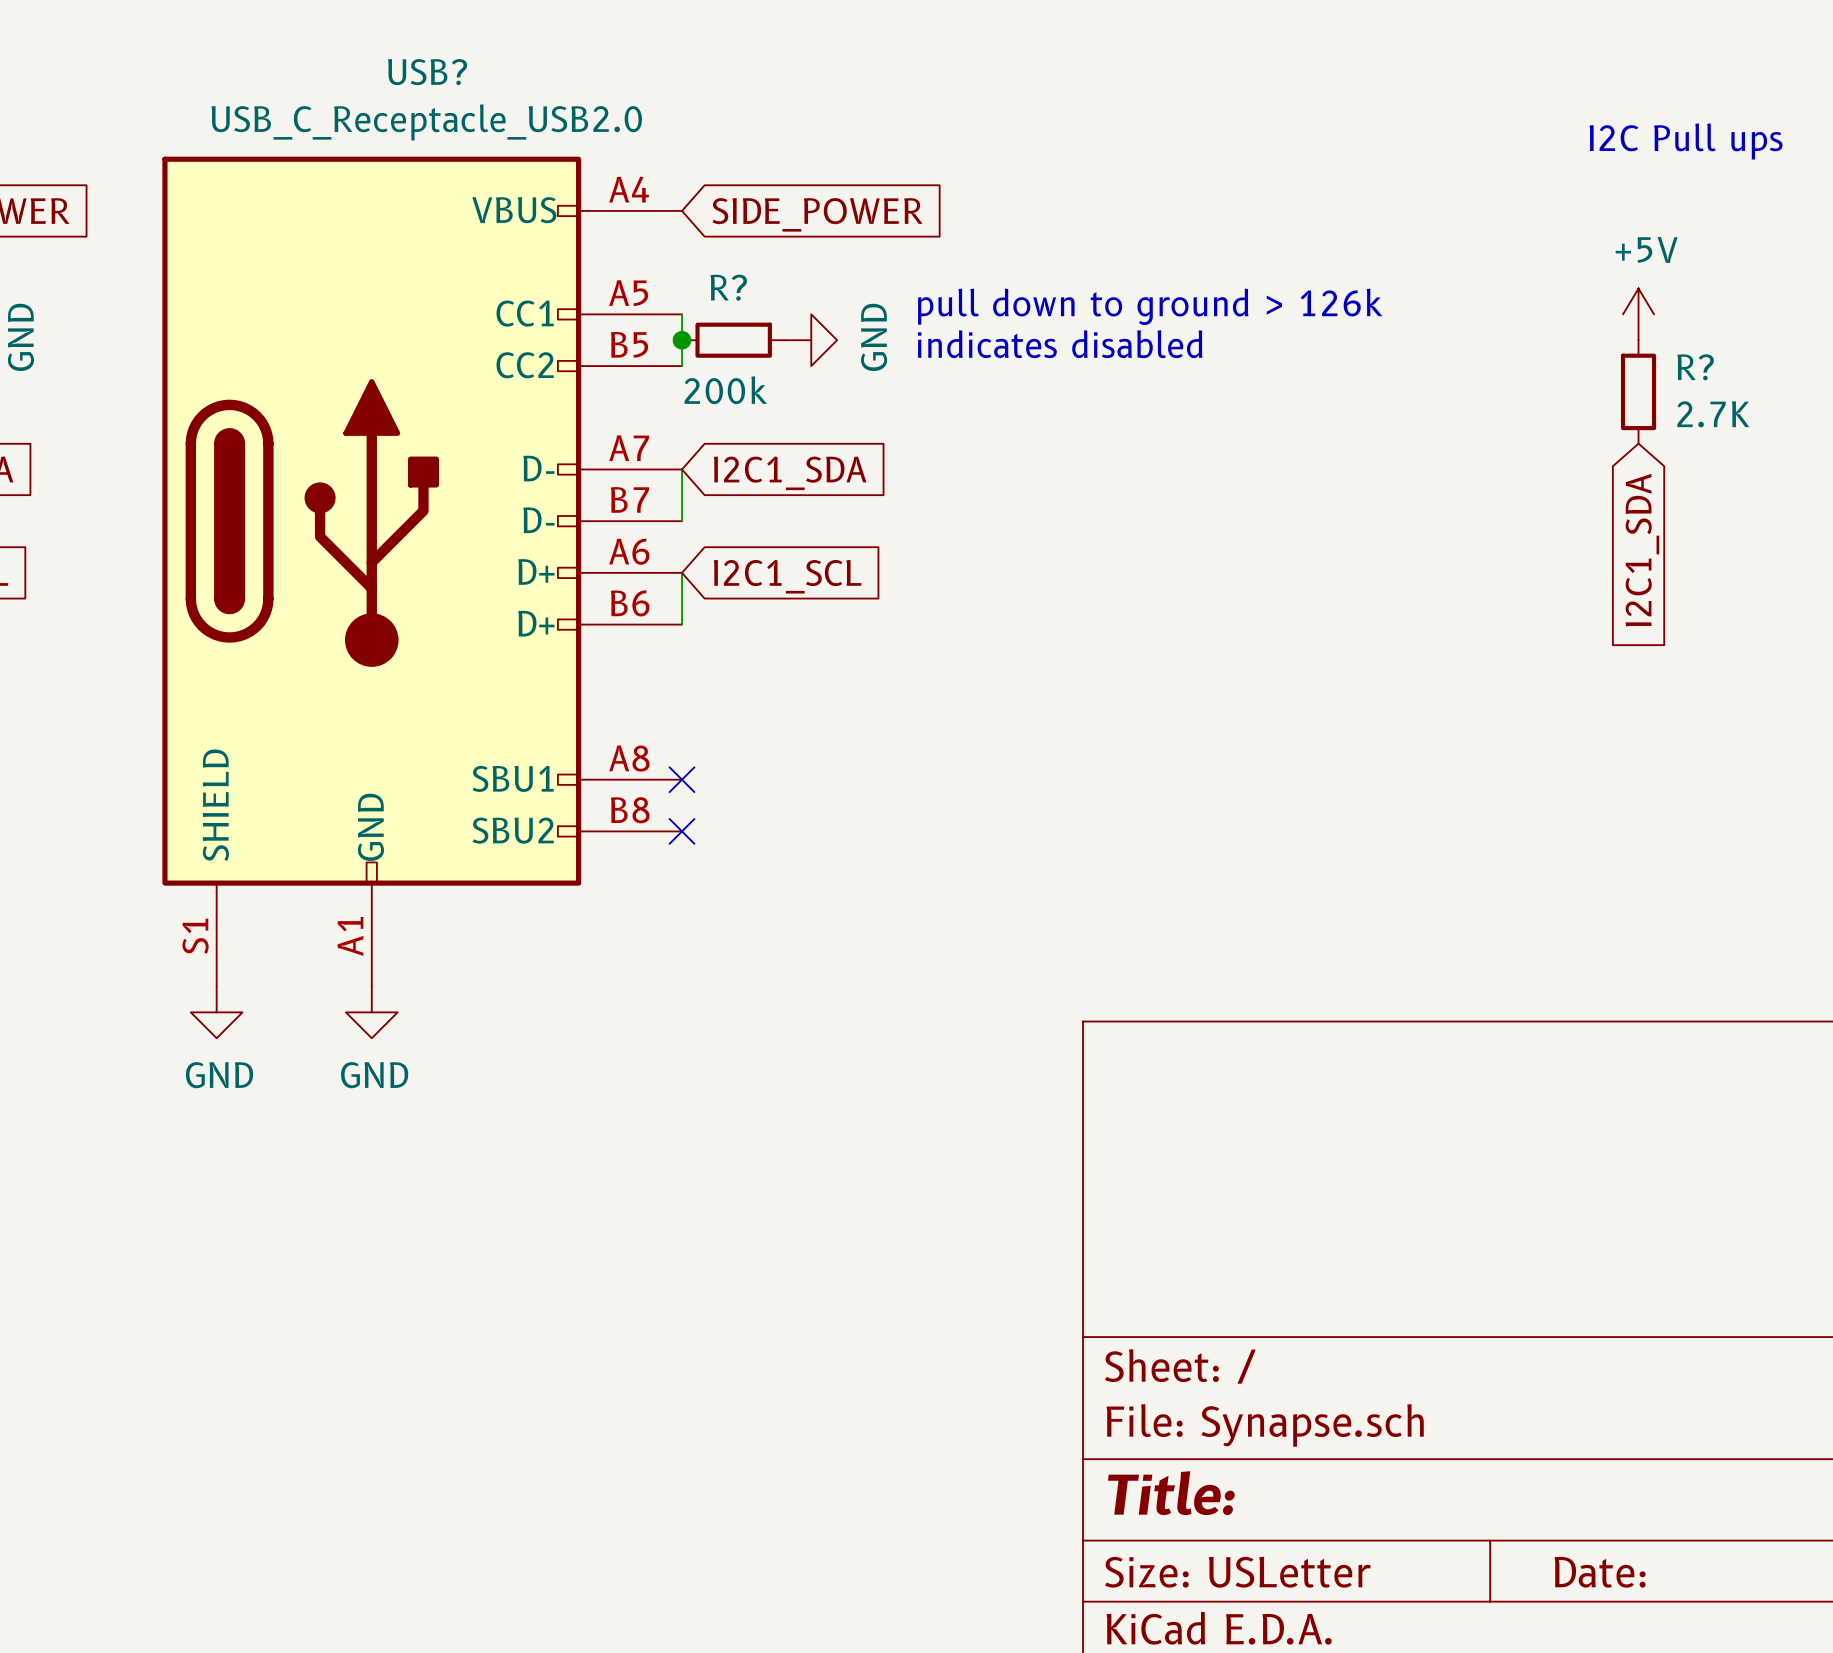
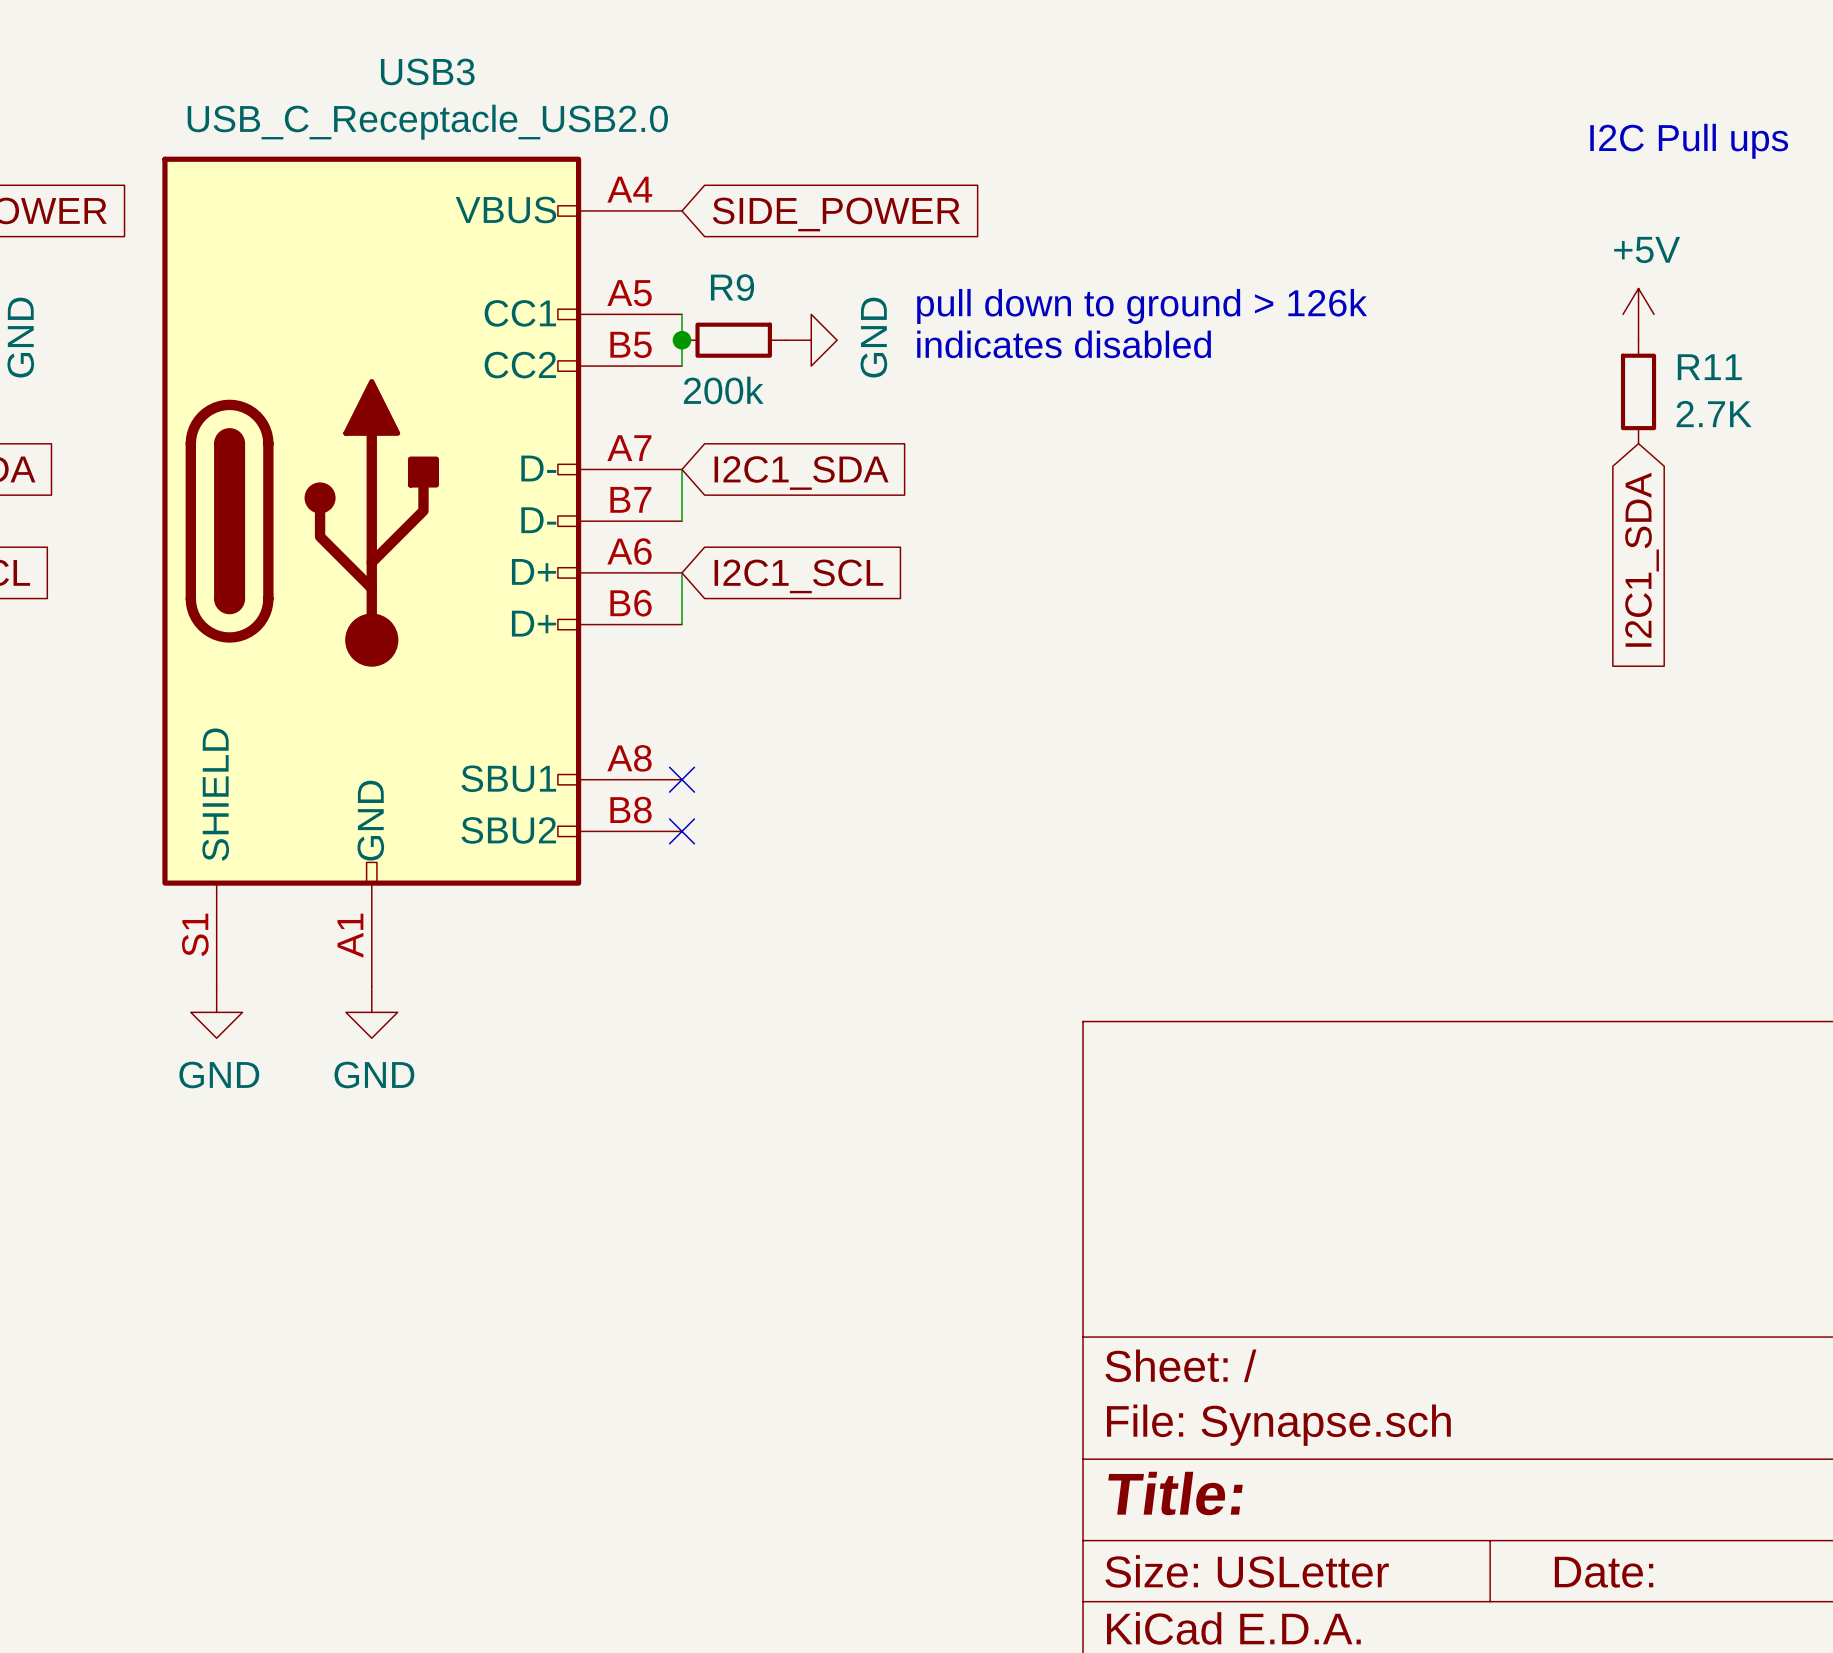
USB? name: USB? (427, 72) -> USB3 (427, 71)
R? name: R? (728, 287) -> R9 (732, 287)
R? name: R? (1695, 367) -> R11 (1709, 367)

